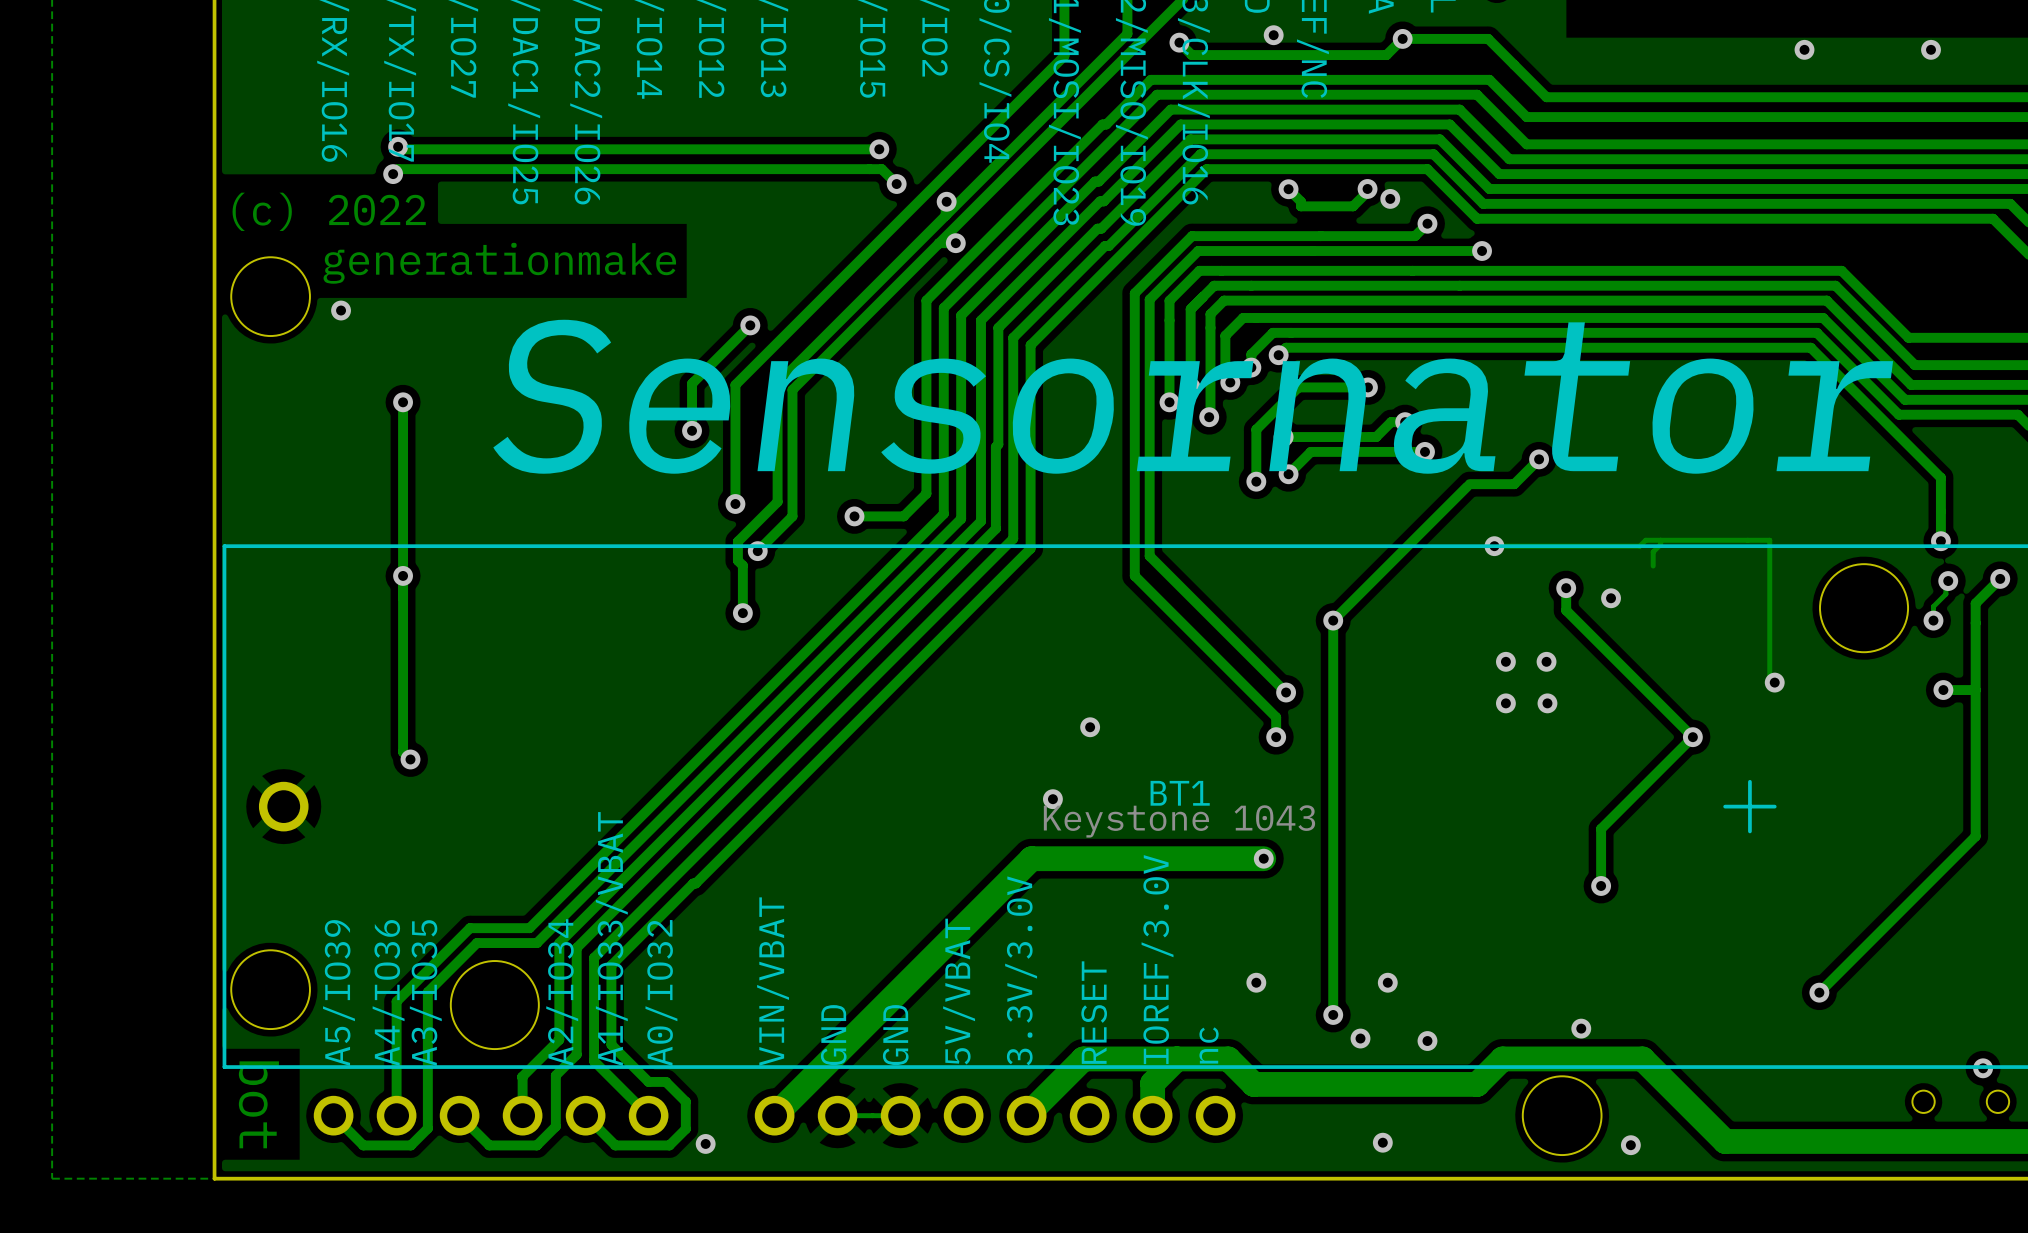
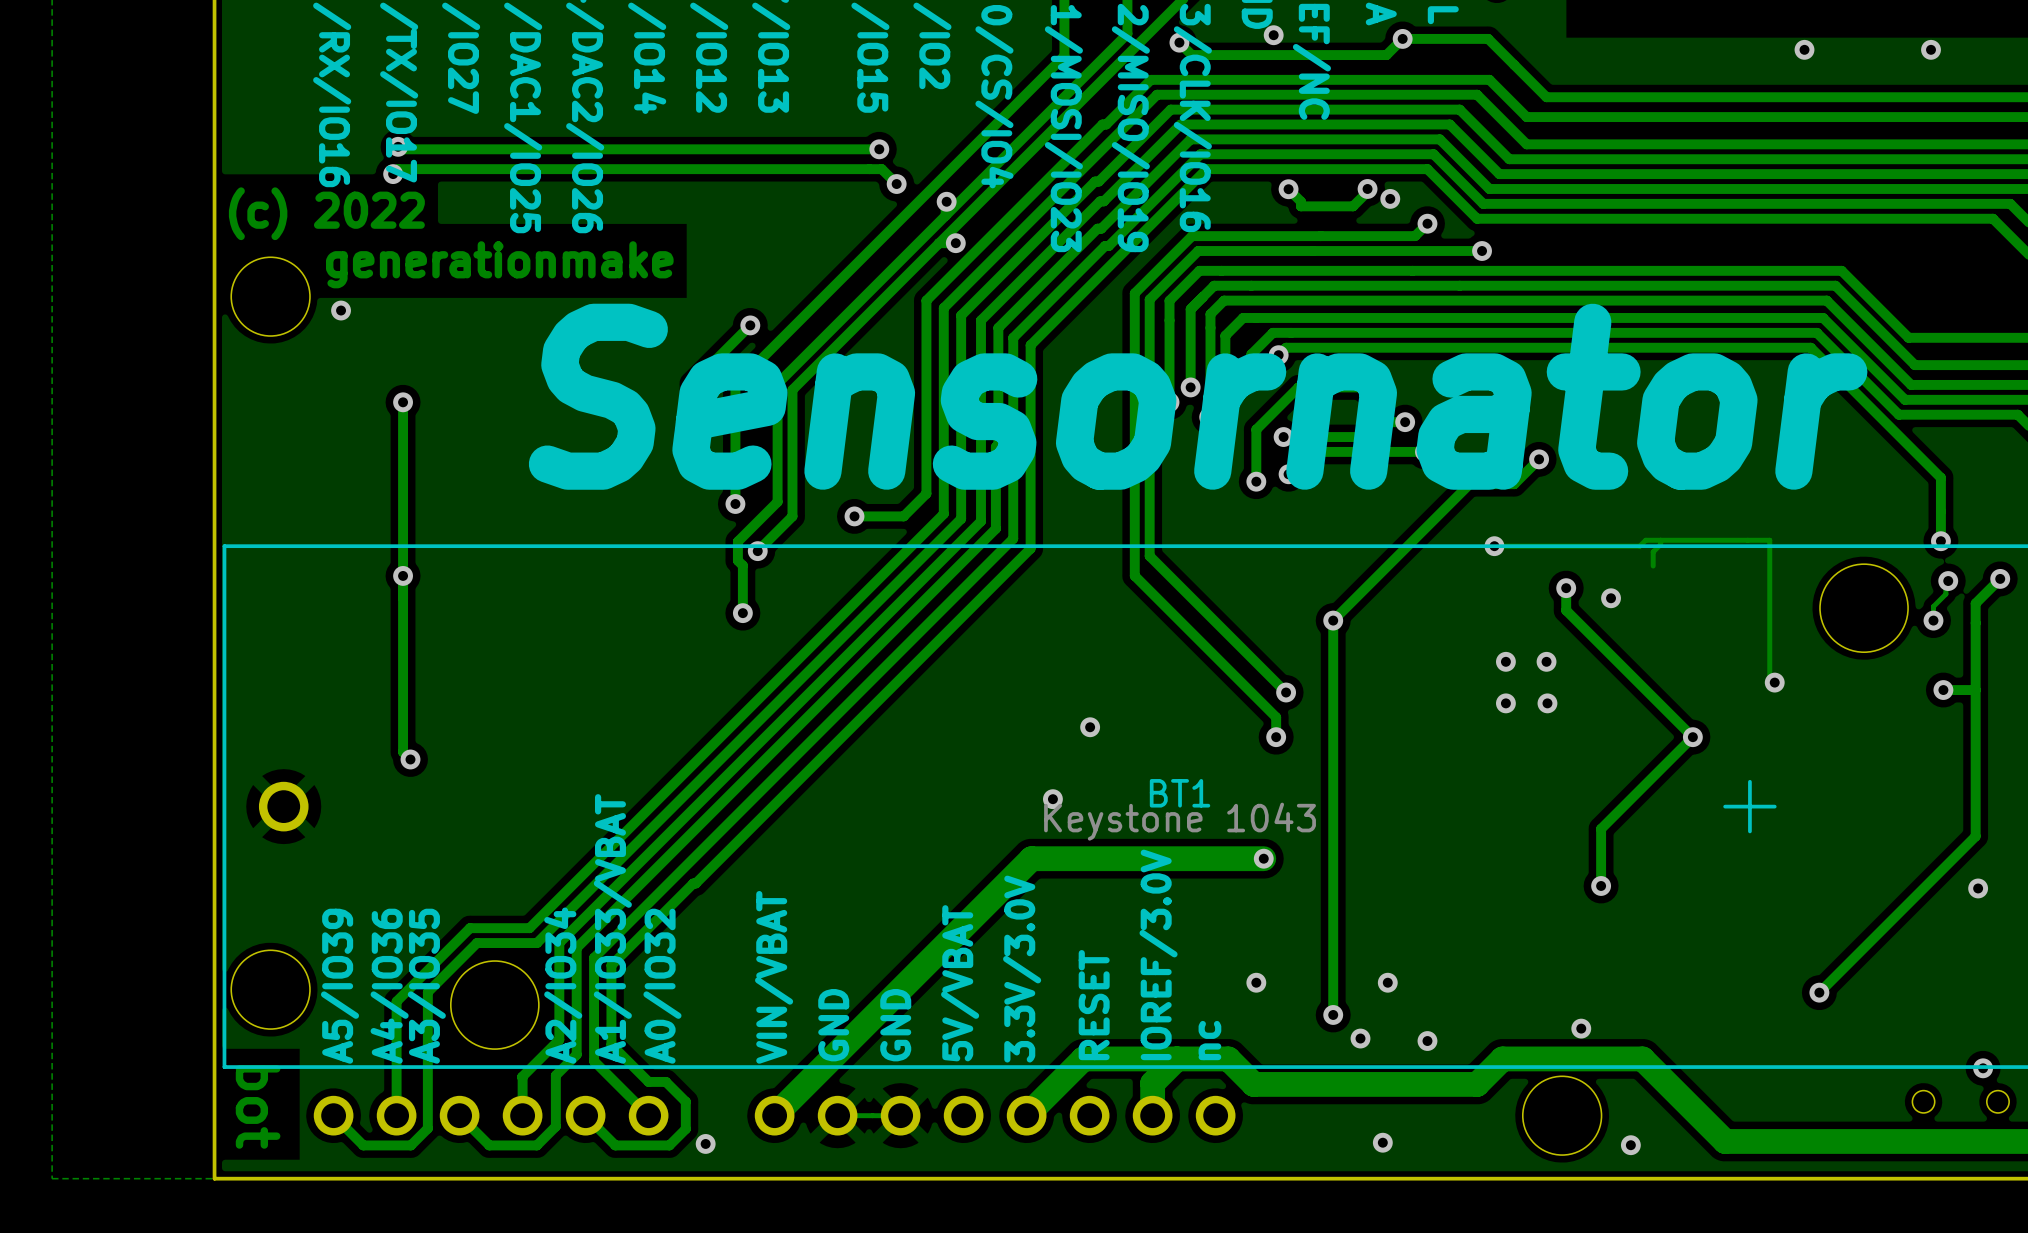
via: none -> (1978, 888)

